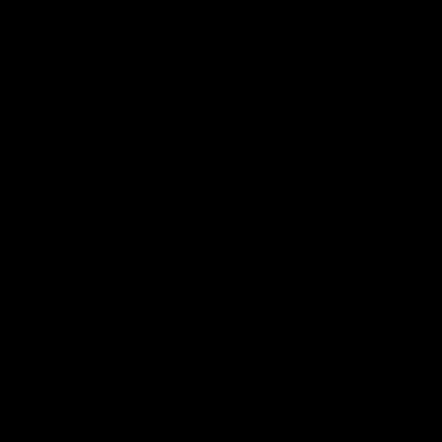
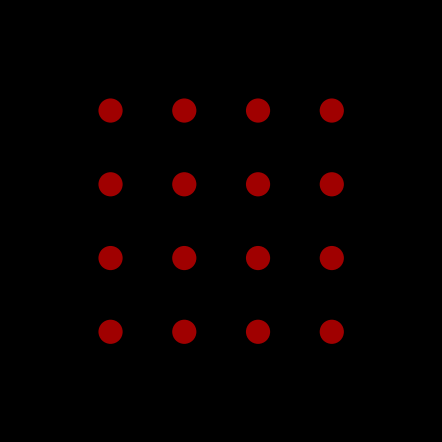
part: none -> (110, 110)
part: none -> (184, 110)
part: none -> (258, 110)
part: none -> (331, 110)
part: none -> (110, 184)
part: none -> (184, 184)
part: none -> (258, 184)
part: none -> (331, 184)
part: none -> (110, 258)
part: none -> (184, 258)
part: none -> (258, 258)
part: none -> (331, 258)
part: none -> (110, 331)
part: none -> (184, 331)
part: none -> (258, 331)
part: none -> (331, 331)

